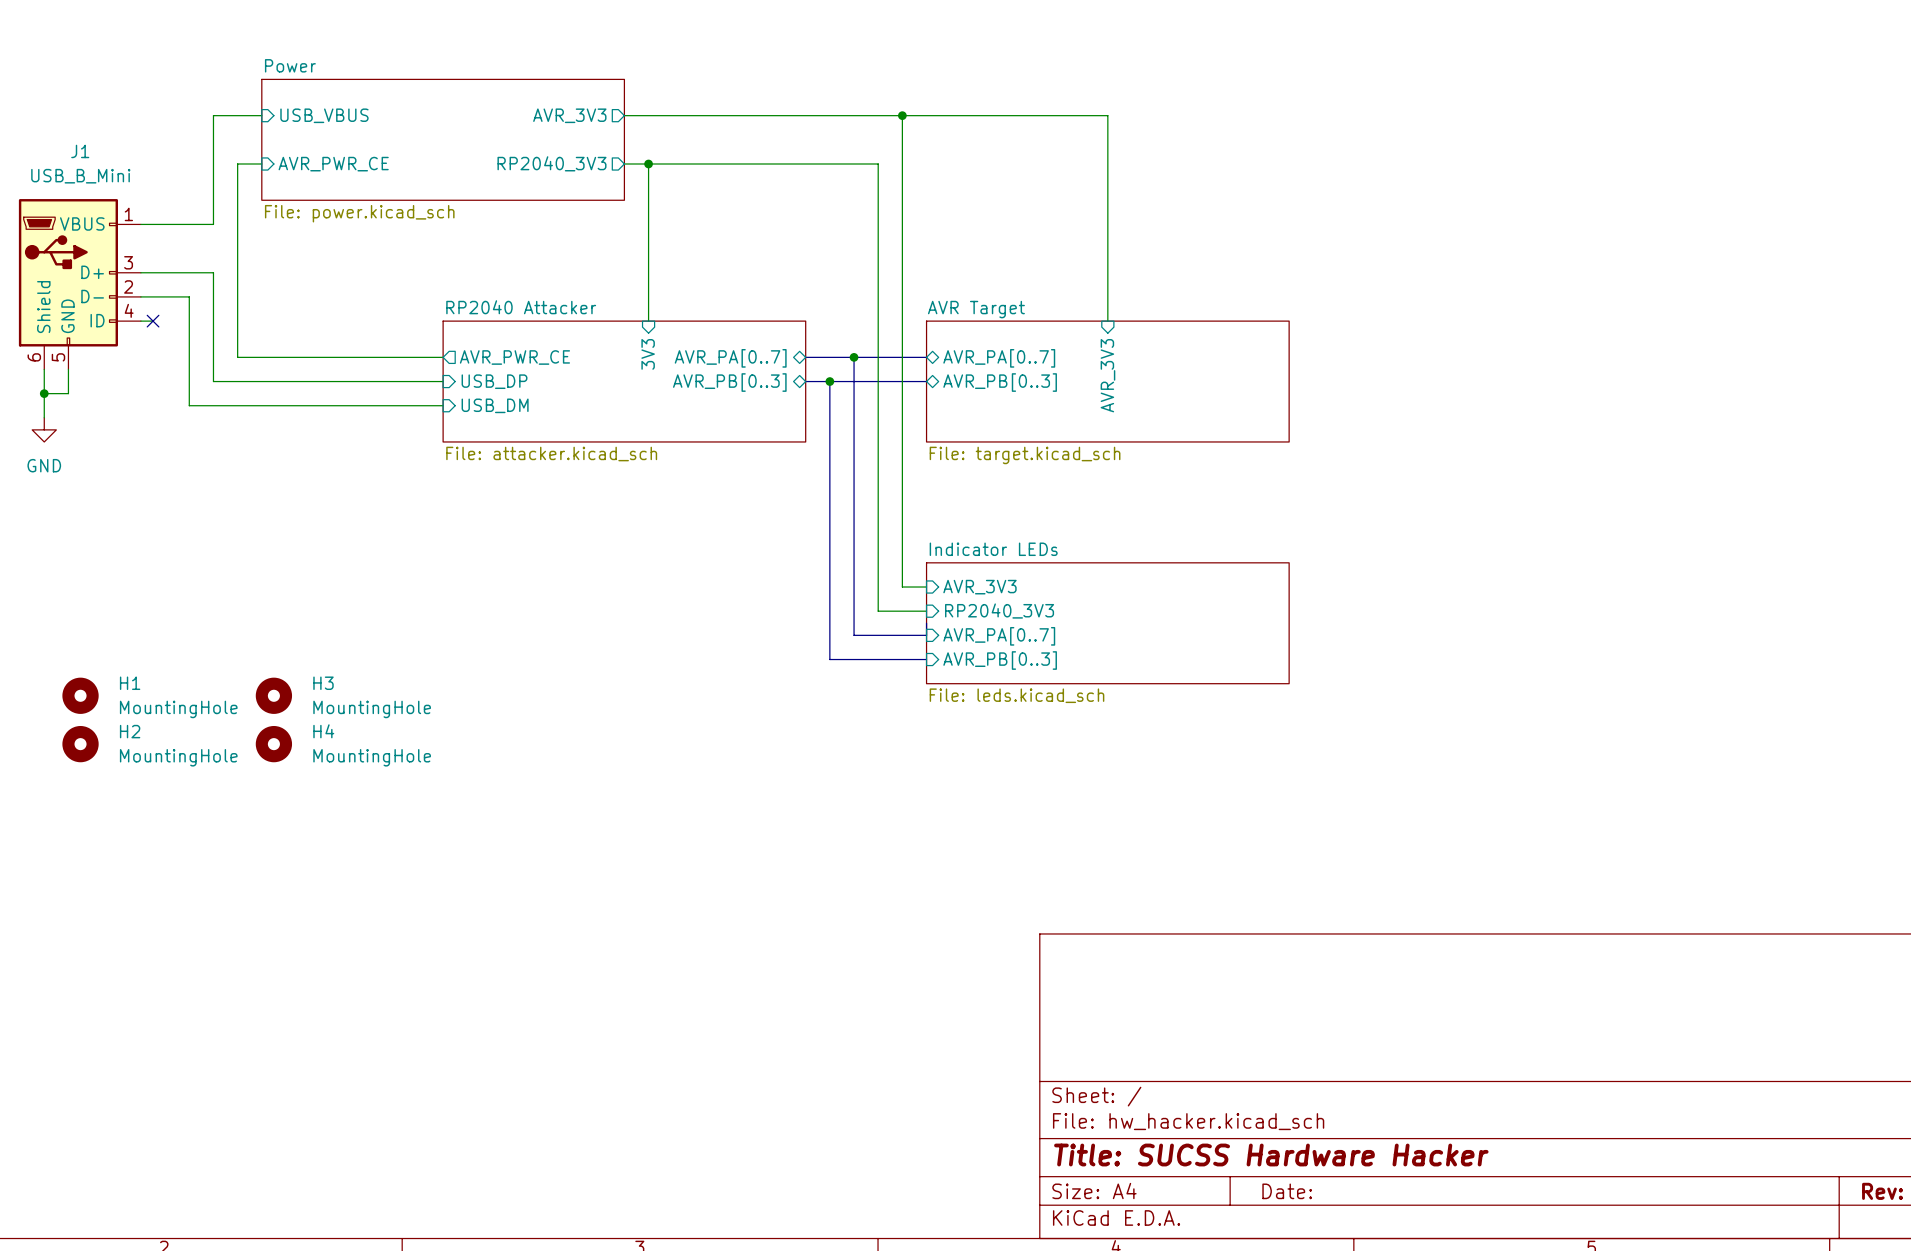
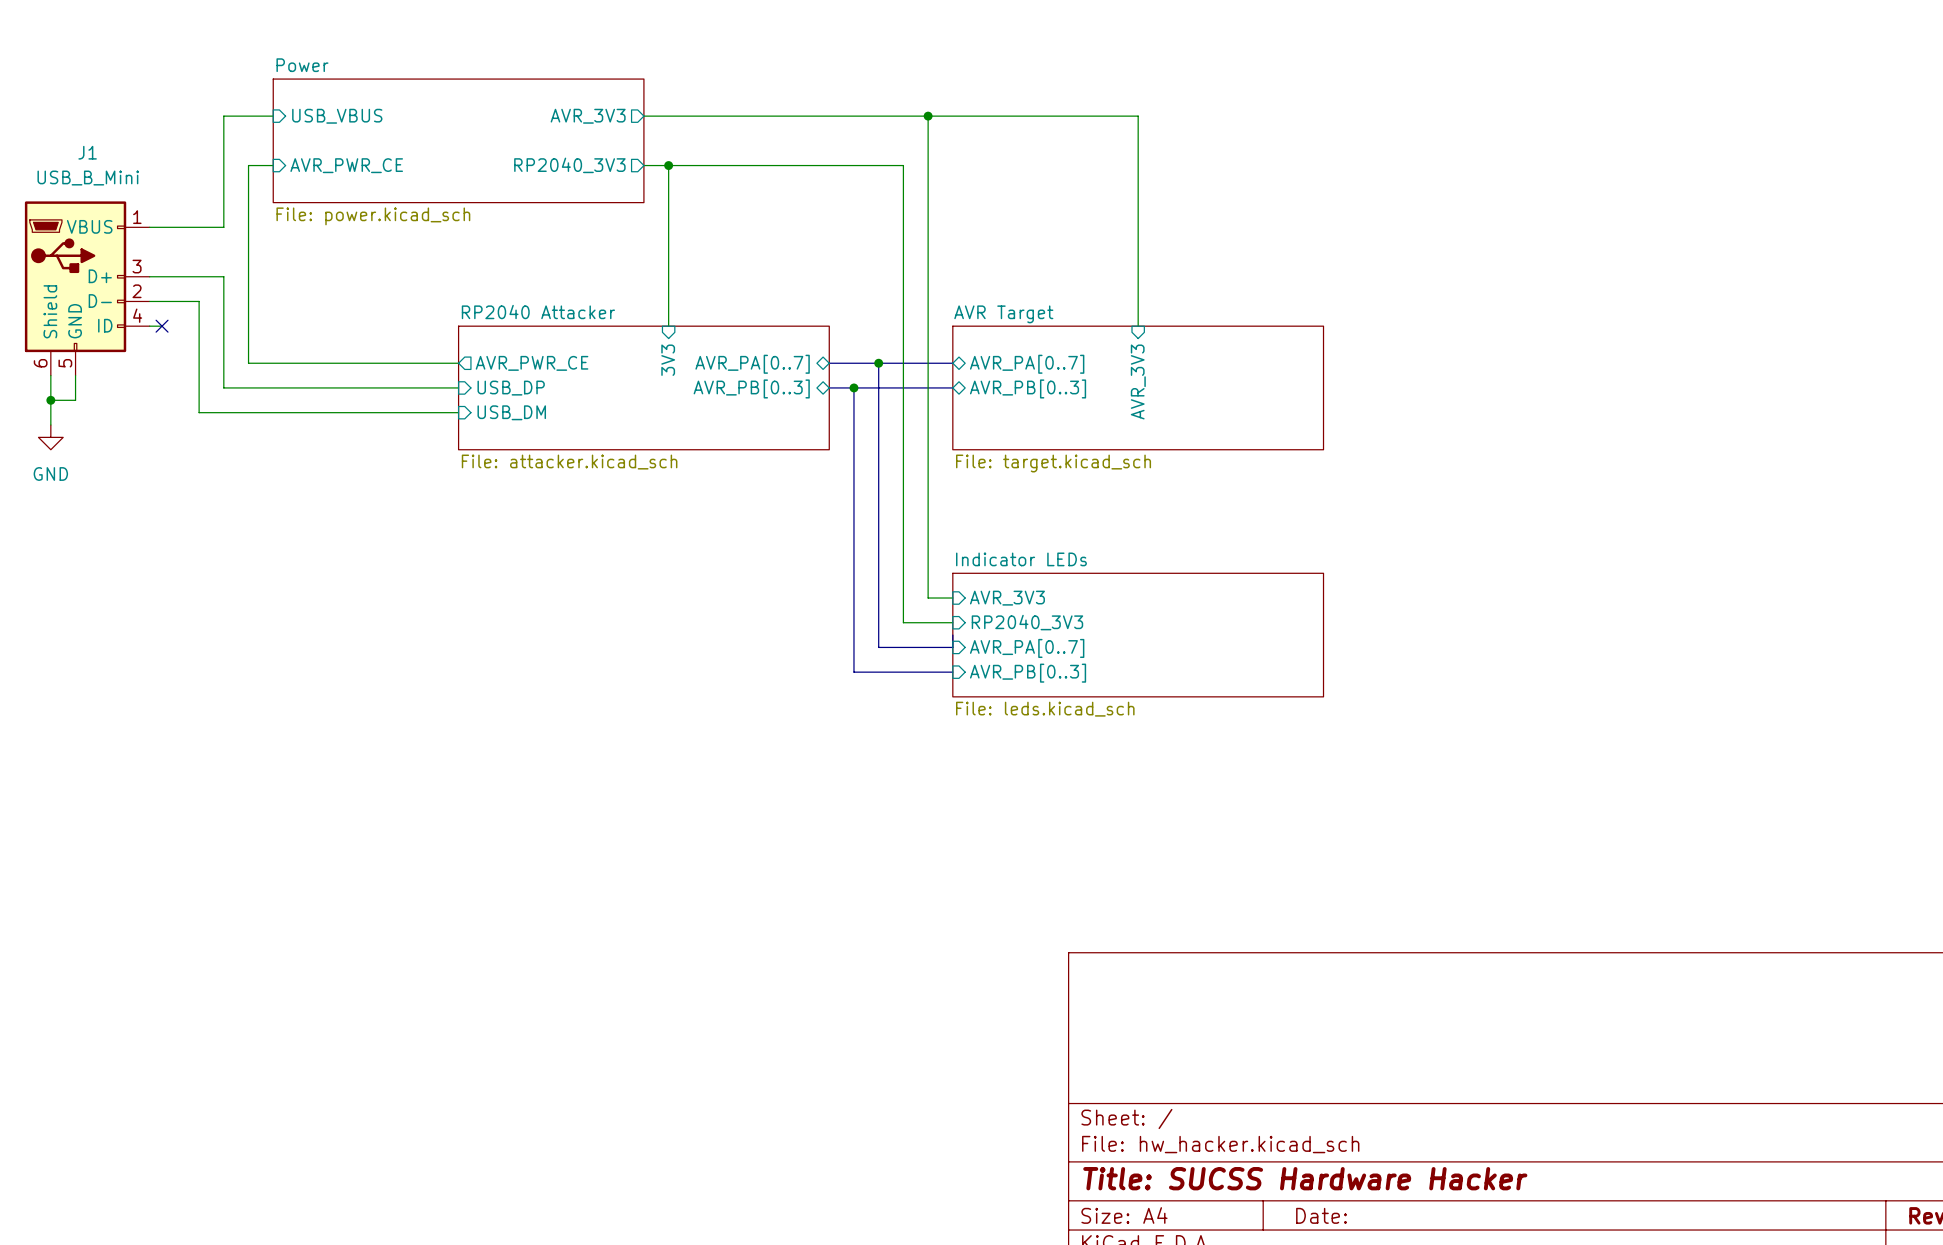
H1: MountingHole (80, 695) -> none
H3: MountingHole (273, 695) -> none
H2: MountingHole (80, 744) -> none
H4: MountingHole (273, 744) -> none

